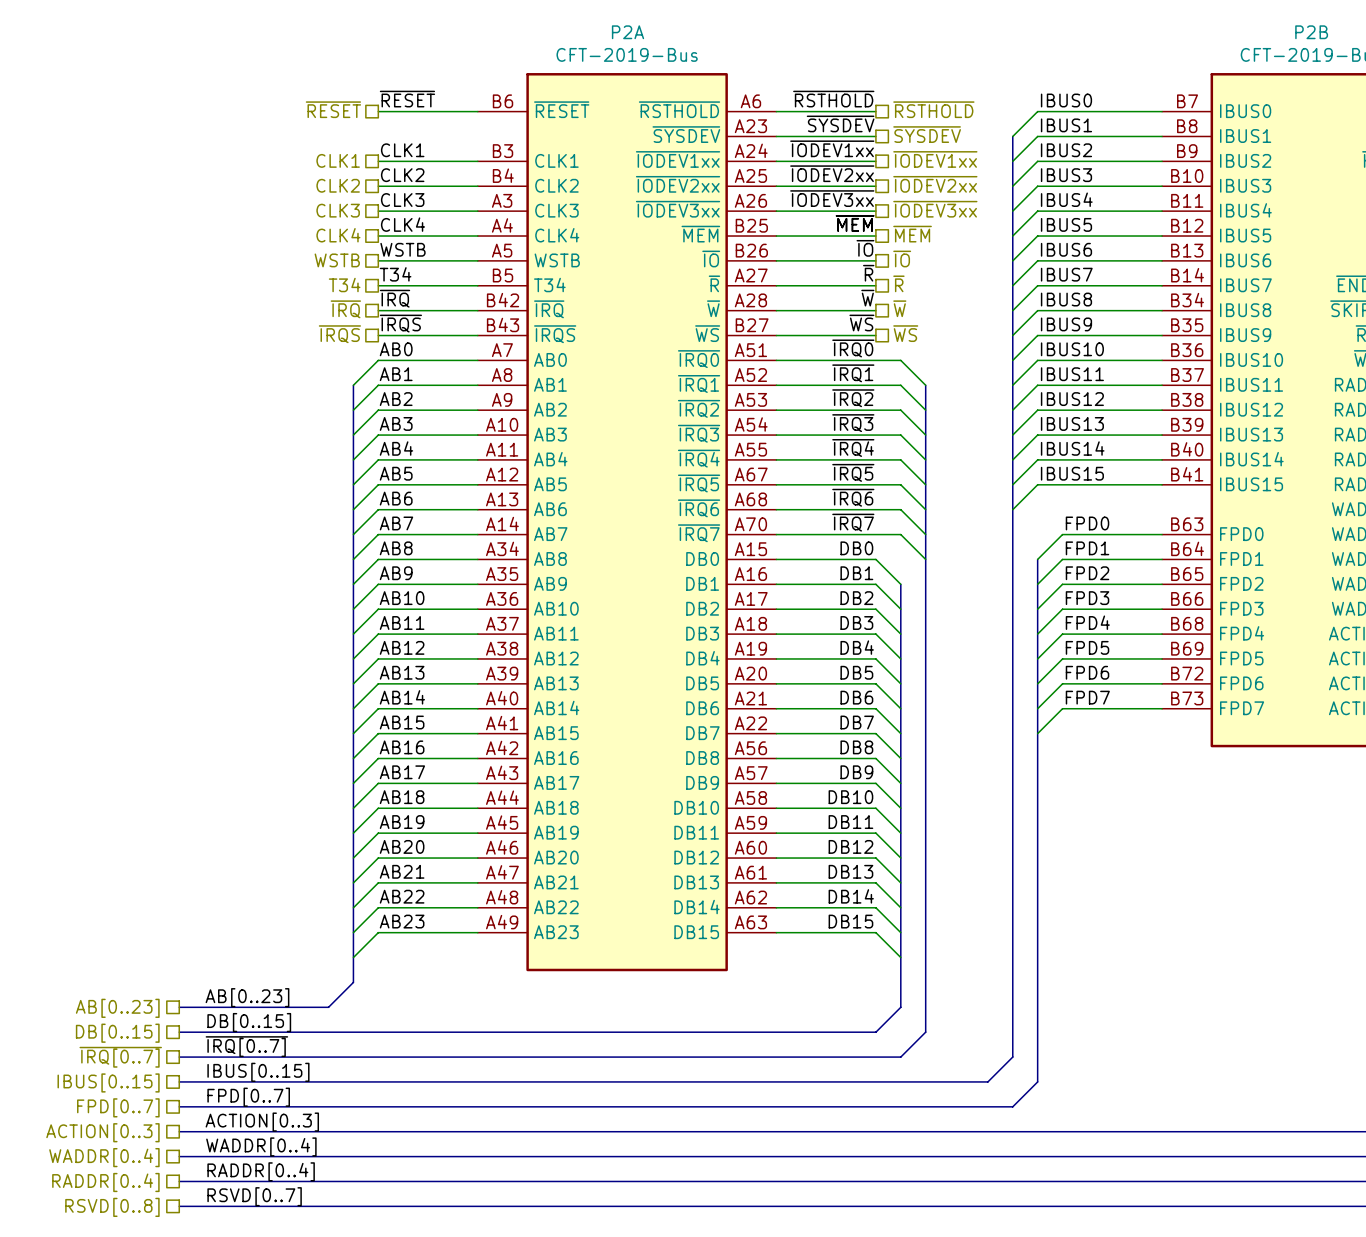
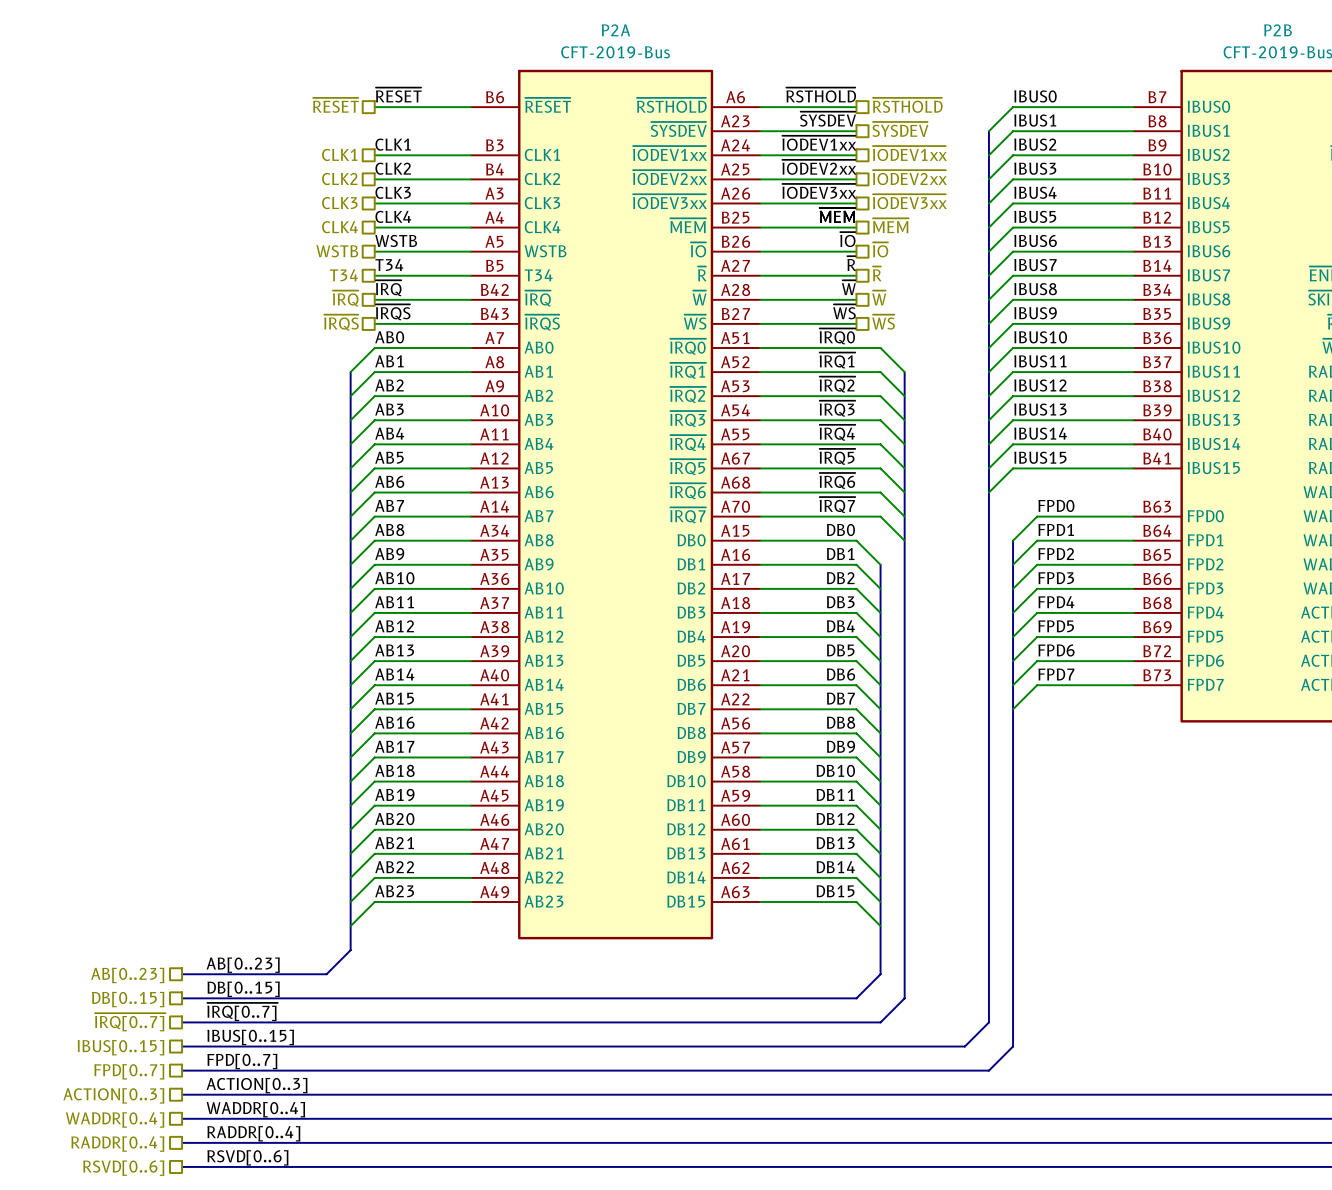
label: RSVD[0..7] (254, 1196) -> RSVD[0..6] (247, 1157)
hierarchical label: RSVD[0..8] (112, 1207) -> RSVD[0..6] (123, 1168)

